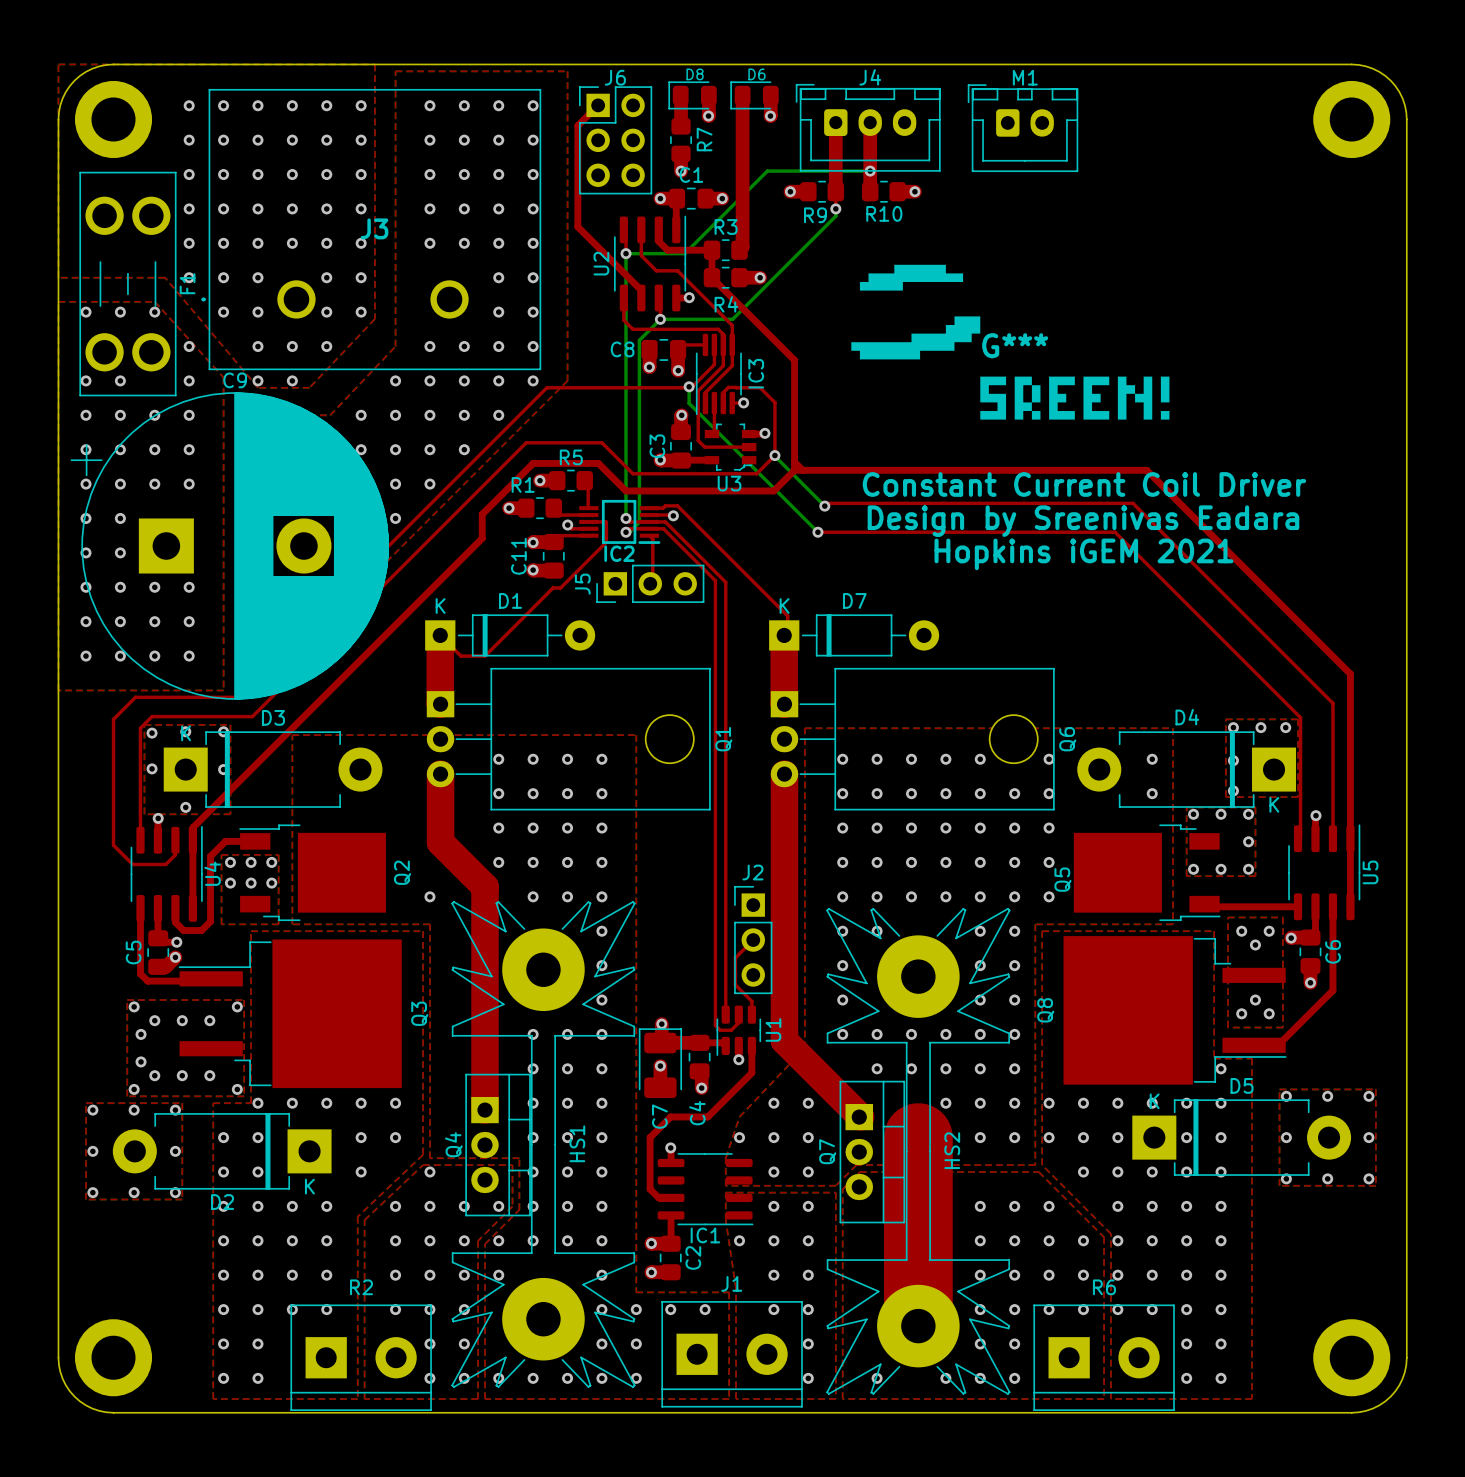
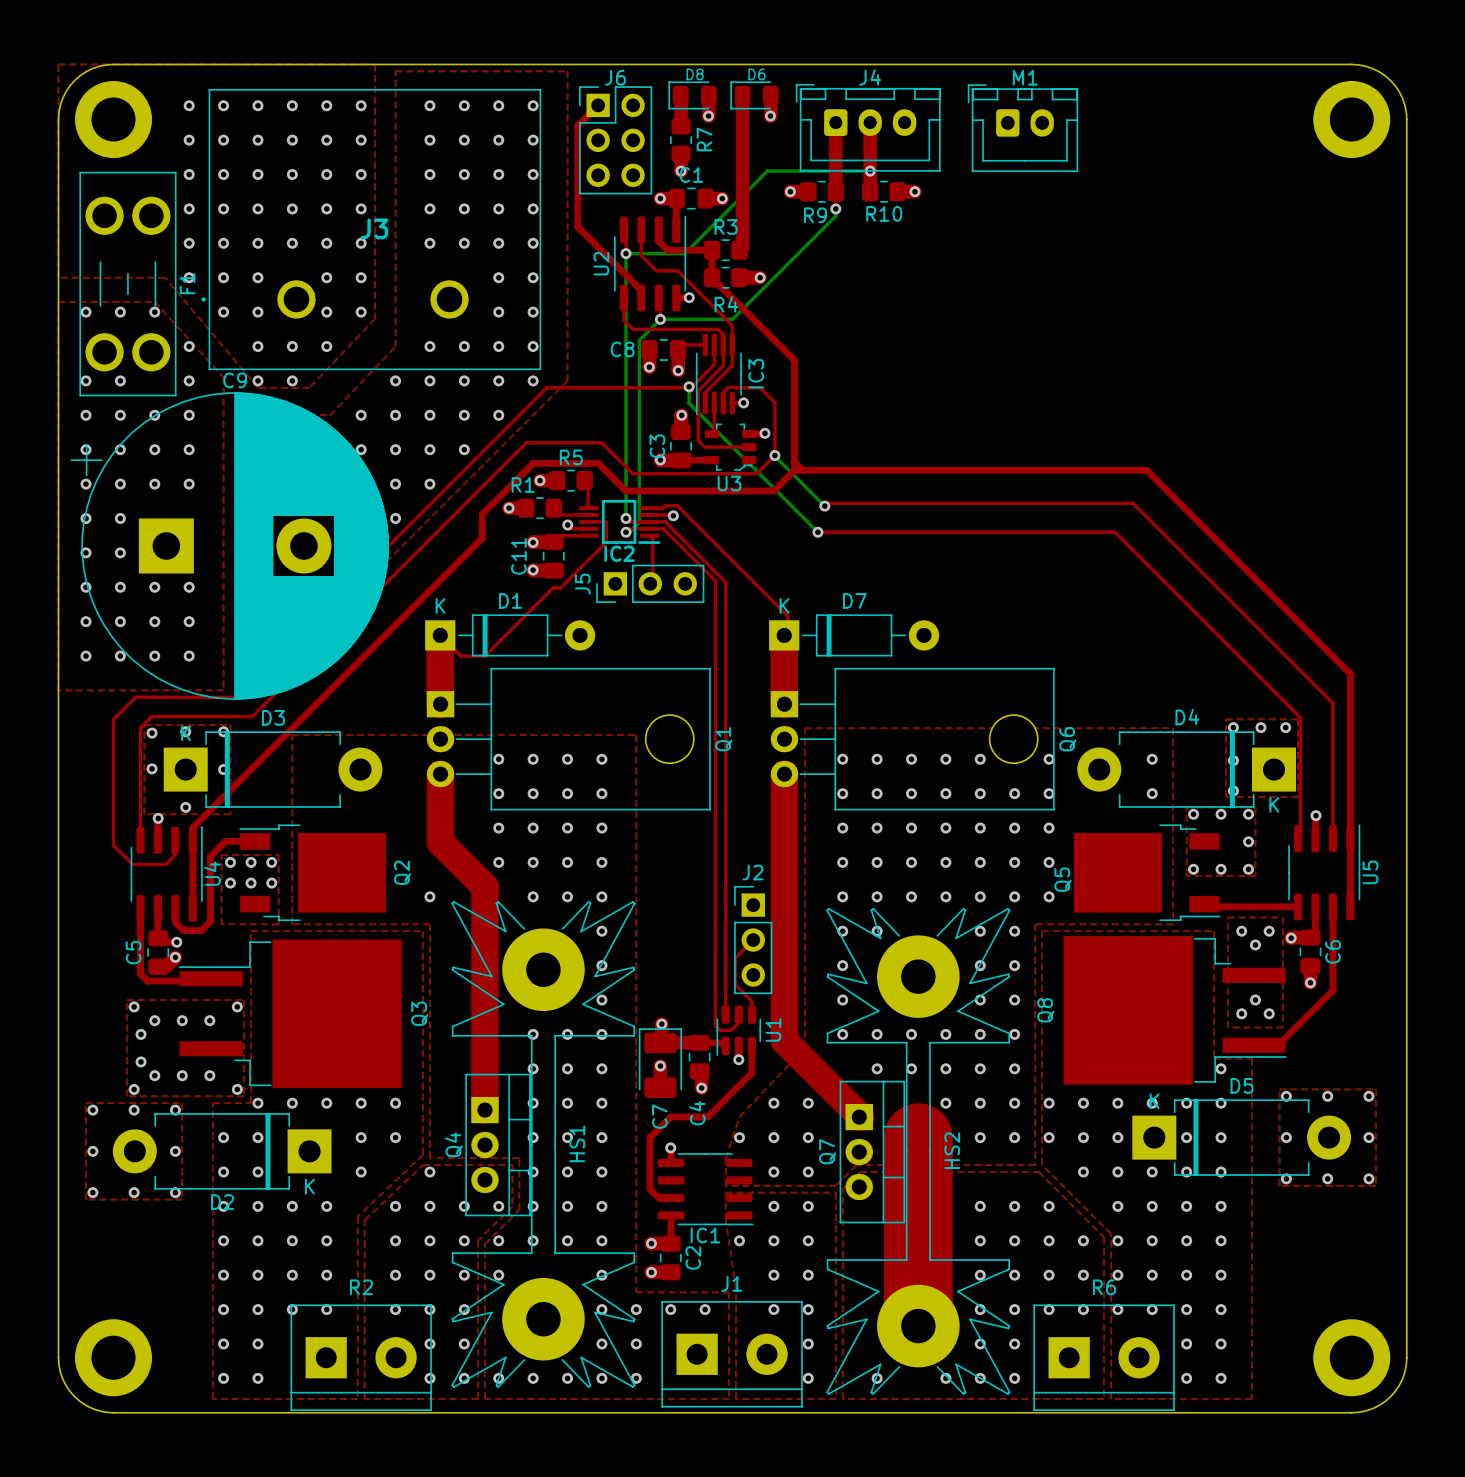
G***: (1010, 342) -> none
text: Constant Current Coil Driver (1084, 484) -> none
text: Design by Sreenivas Eadara (1083, 521) -> none
text: Hopkins iGEM 2021 (1083, 554) -> none

